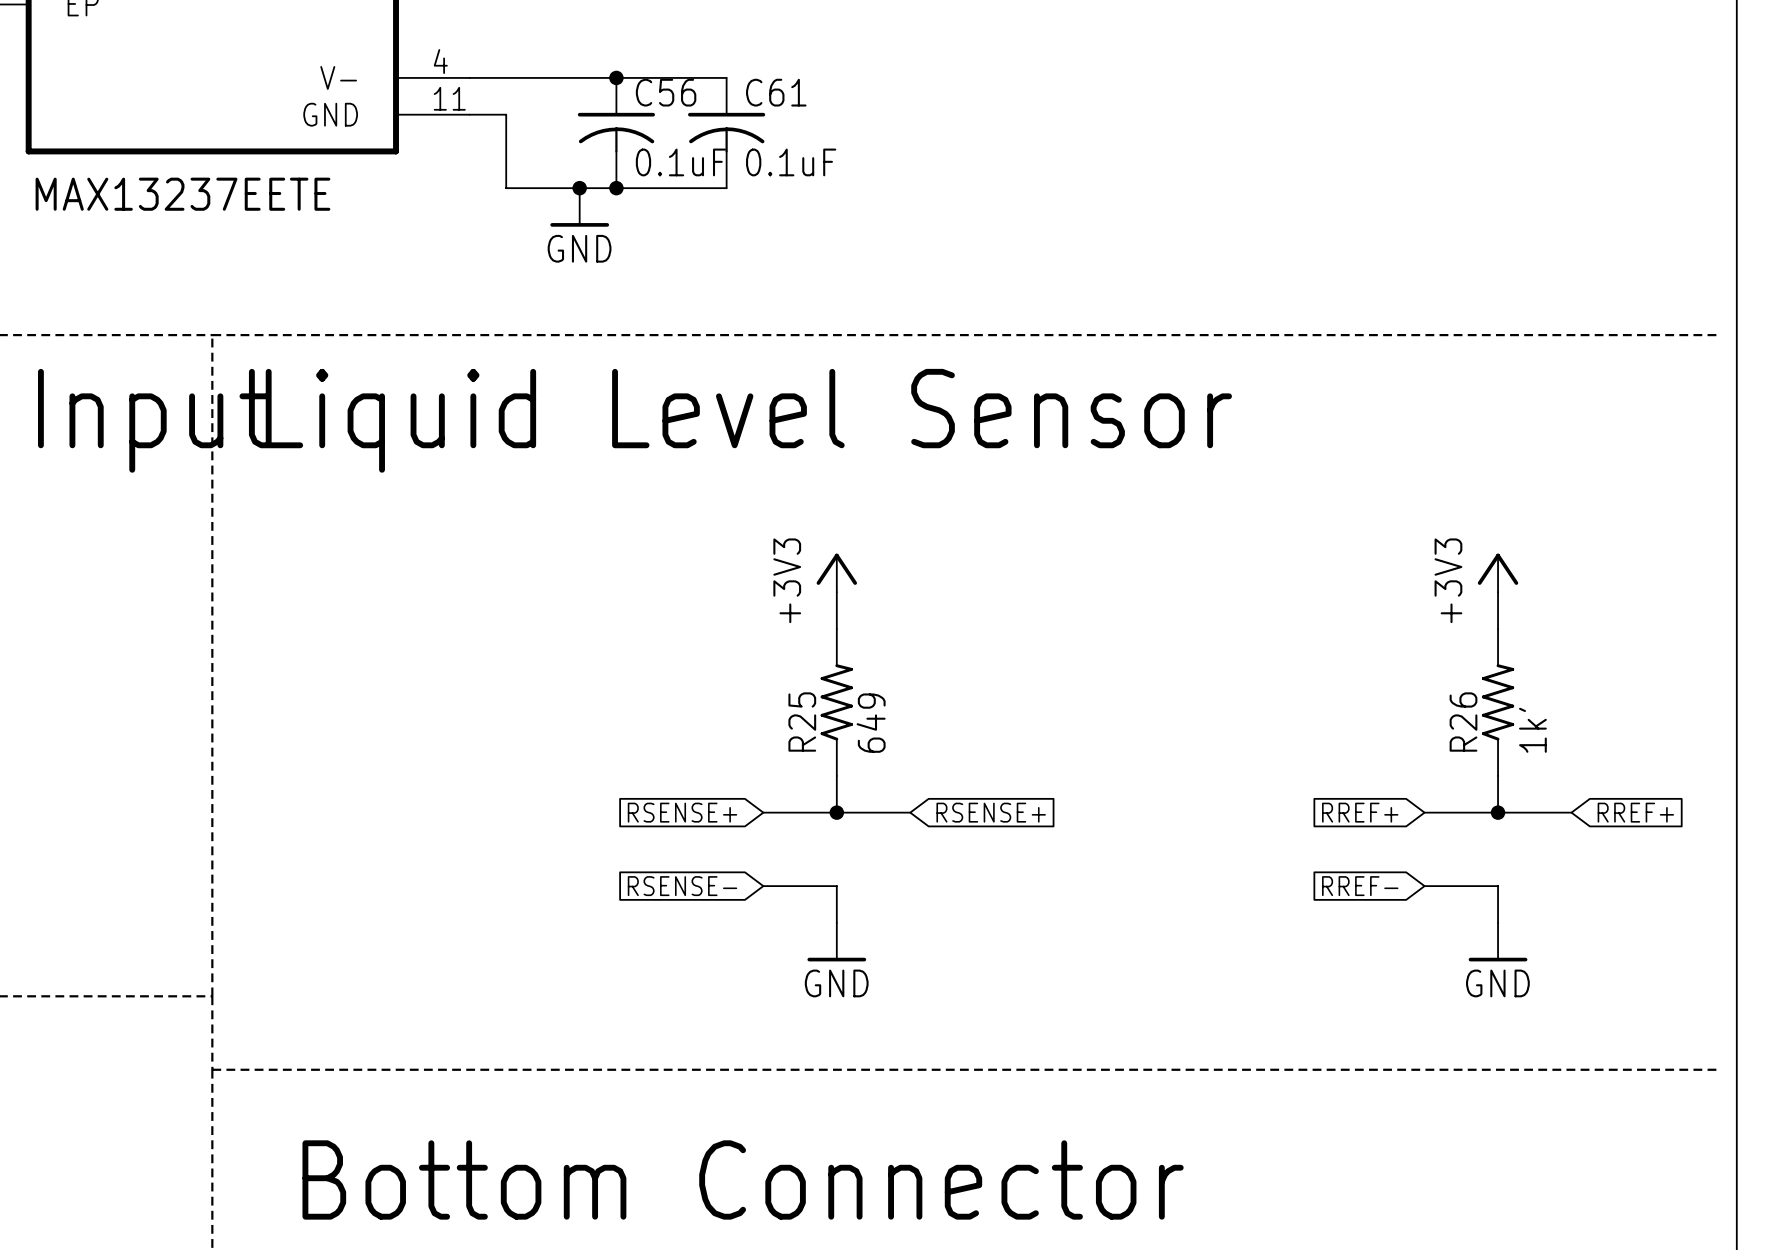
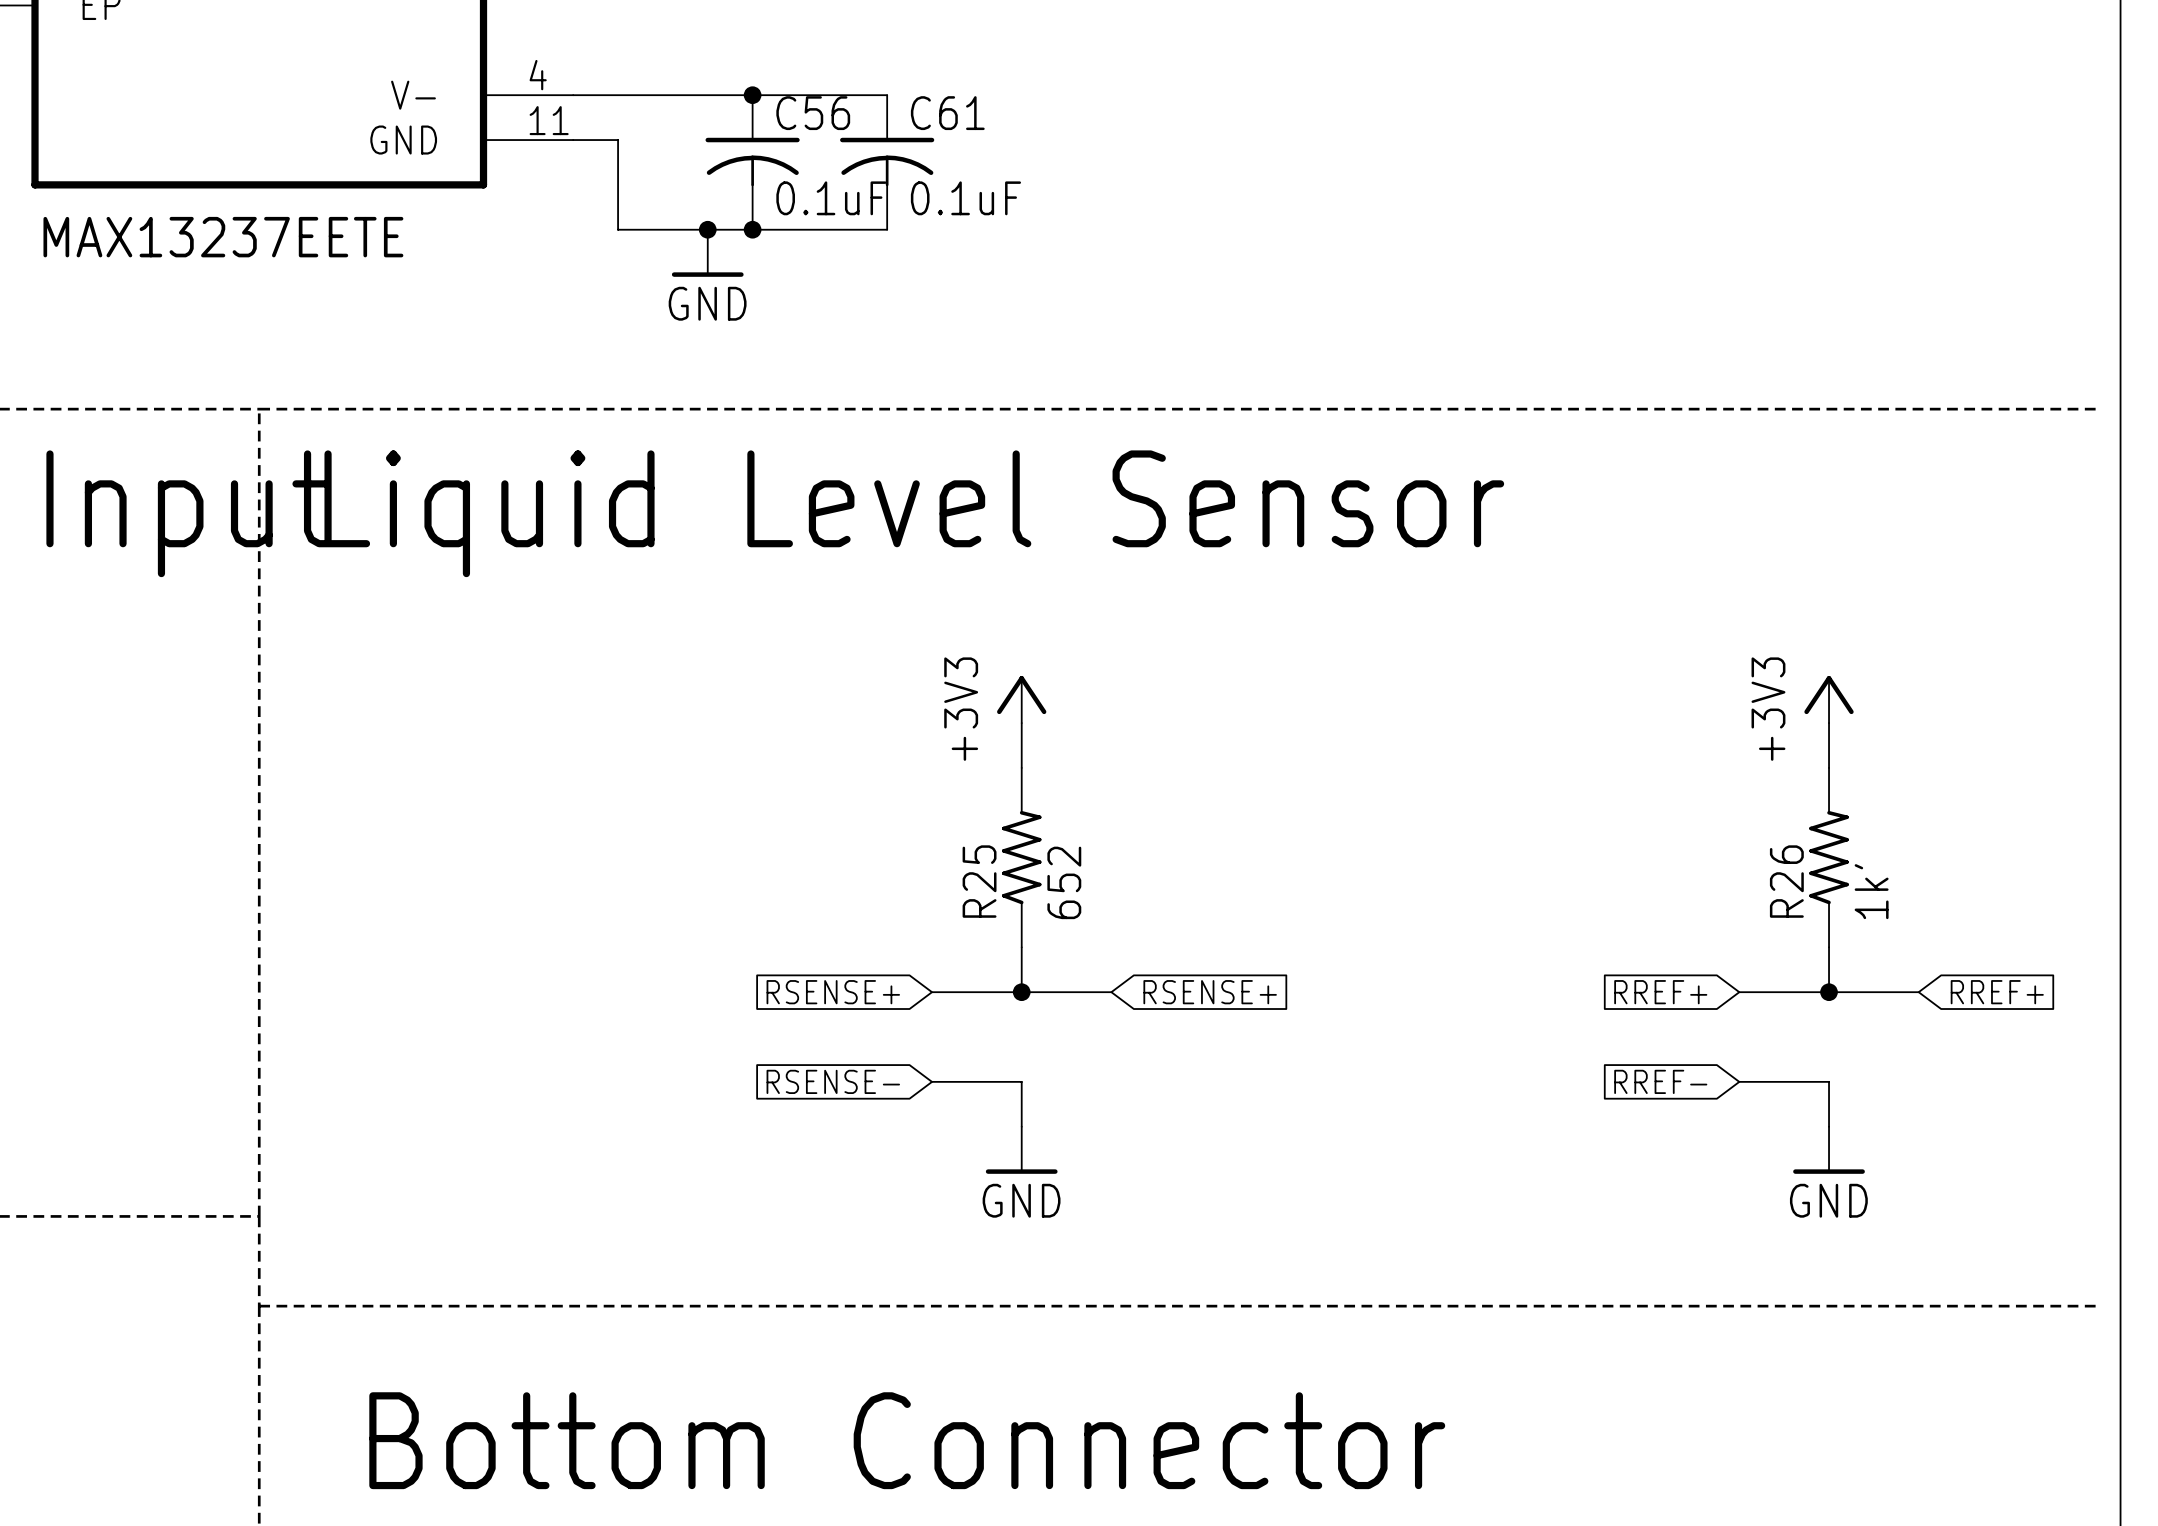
R25 value: 649 (871, 723) -> 652 (1064, 882)

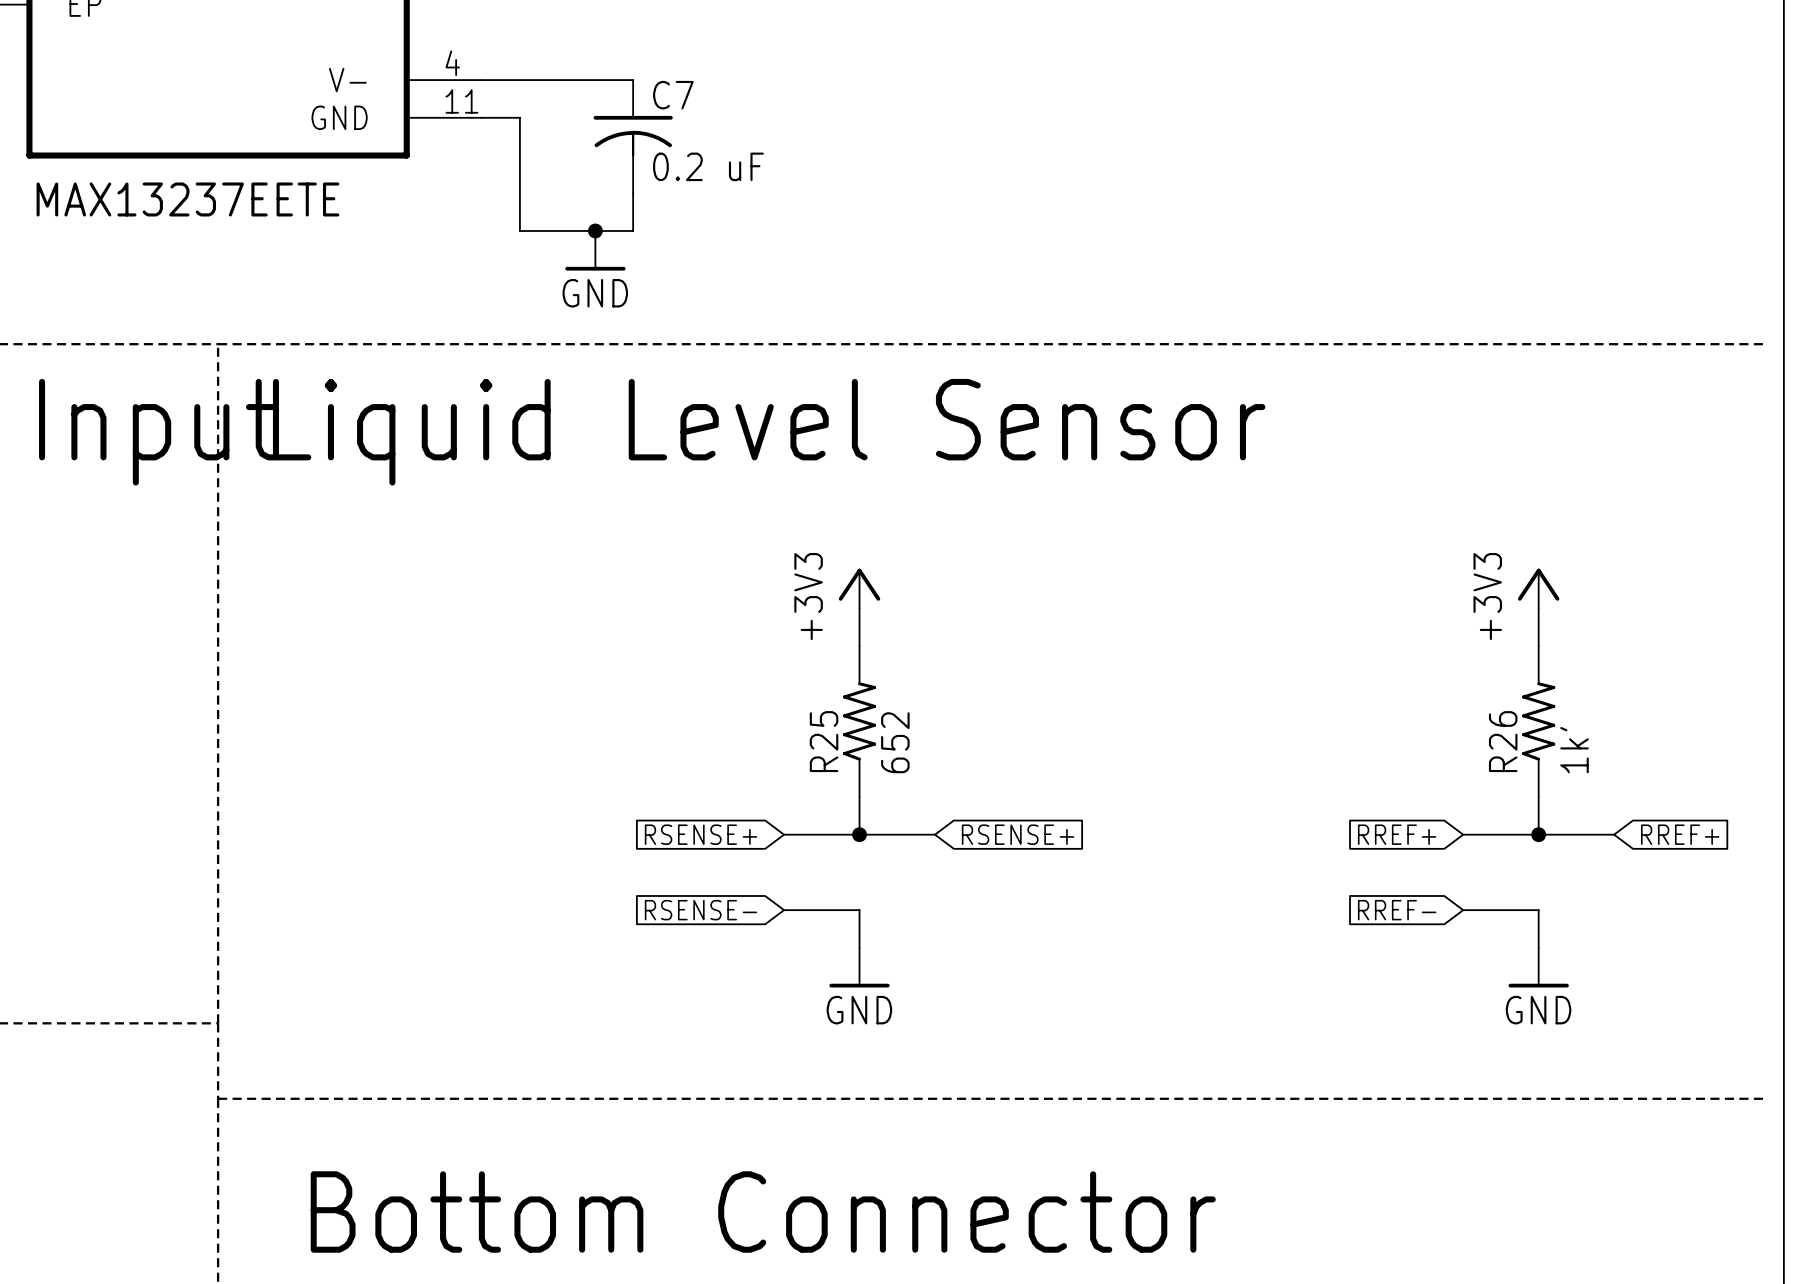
wire: (752, 95) (887, 95) -> none
junction: (752, 95) -> none
C56 name: C56 (813, 113) -> C7 (673, 95)
C61: 0.1uF (887, 162) -> none
C56 value: 0.1uF (831, 198) -> 0.2 uF (708, 166)
wire: (618, 229) (887, 229) -> (519, 193) (519, 230) (633, 230) (633, 193)
junction: (707, 229) -> none
junction: (752, 229) -> none
power symbol position: GND (707, 253) -> GND (595, 250)
junction: none -> (595, 230)

